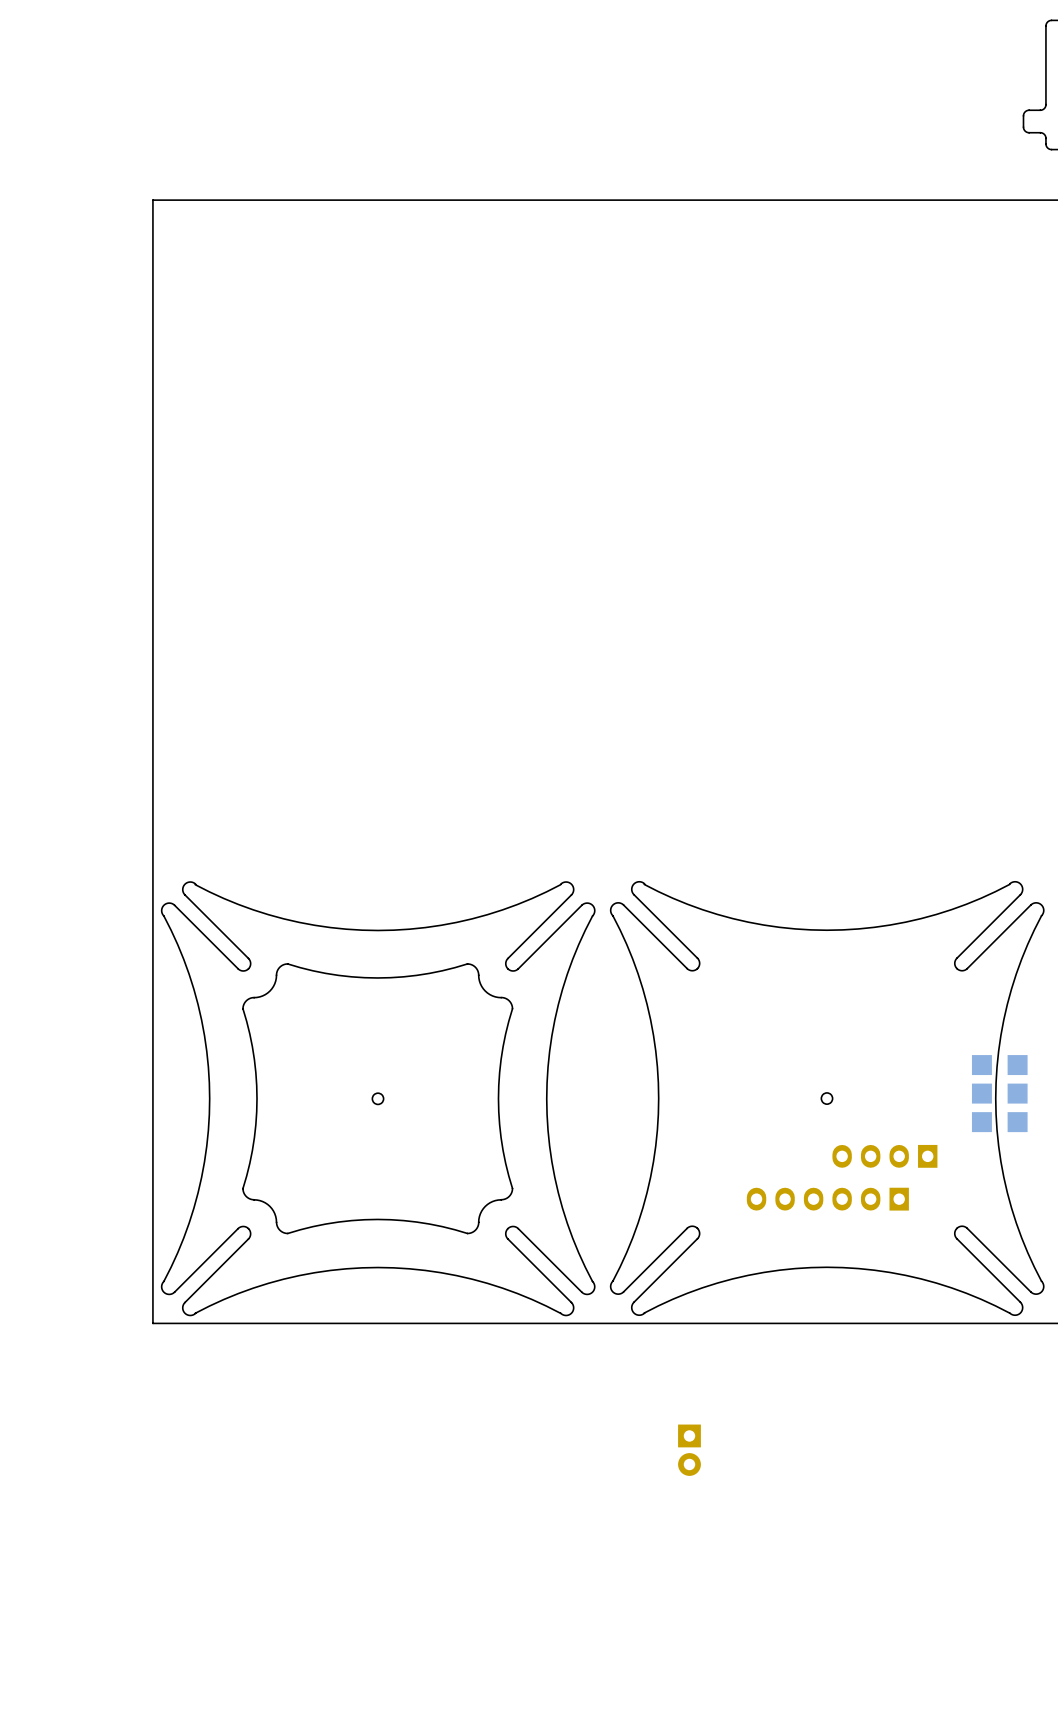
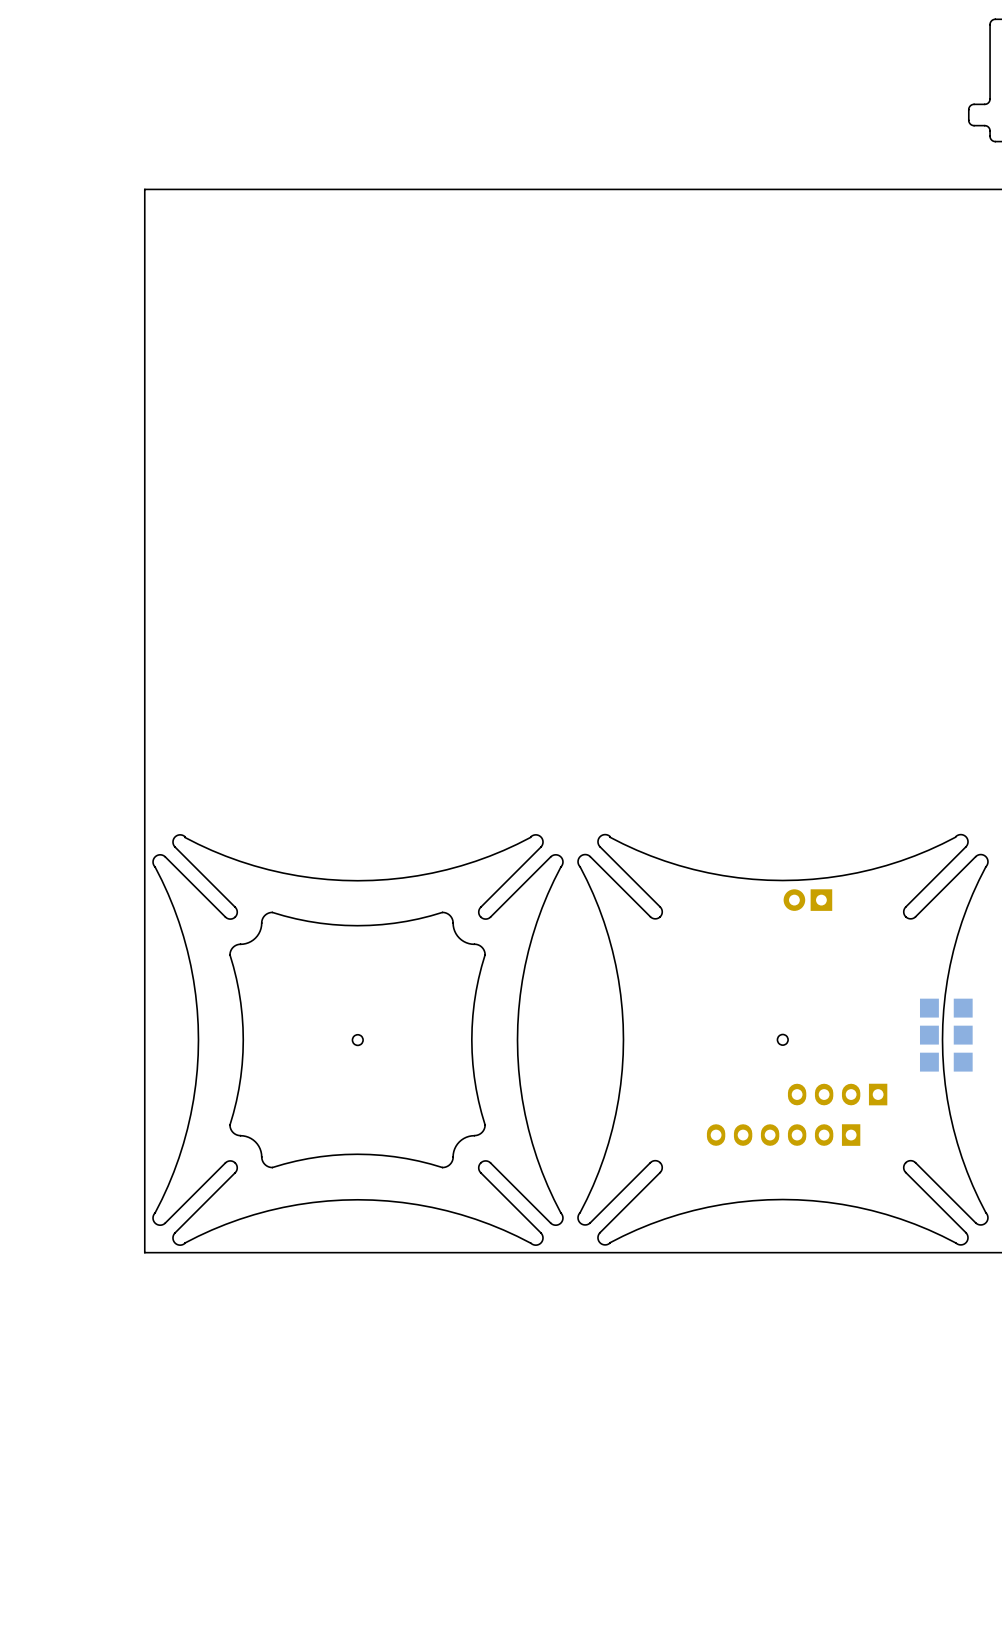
part: none -> (807, 900)
part: (689, 1450) -> none

